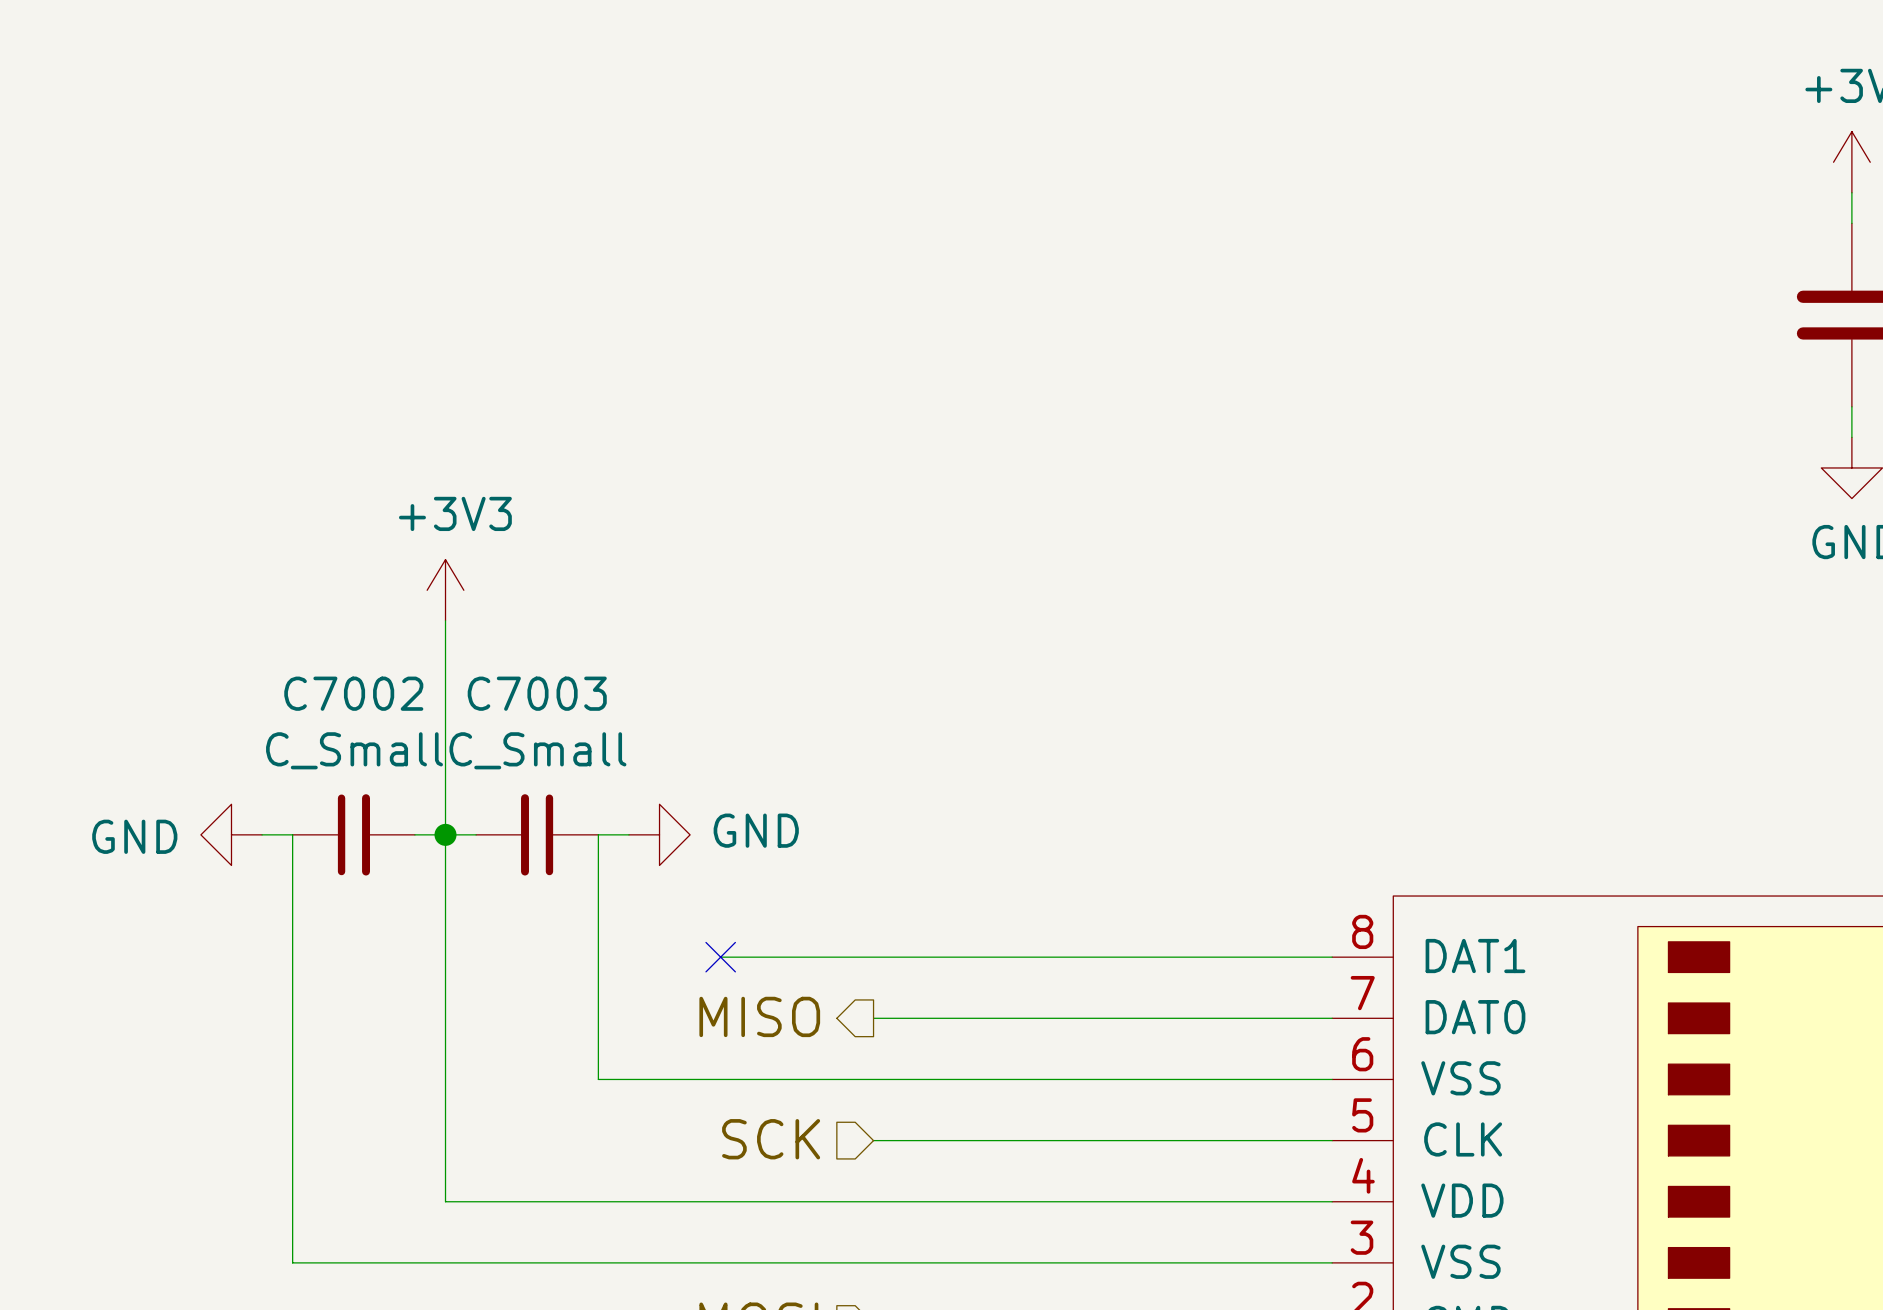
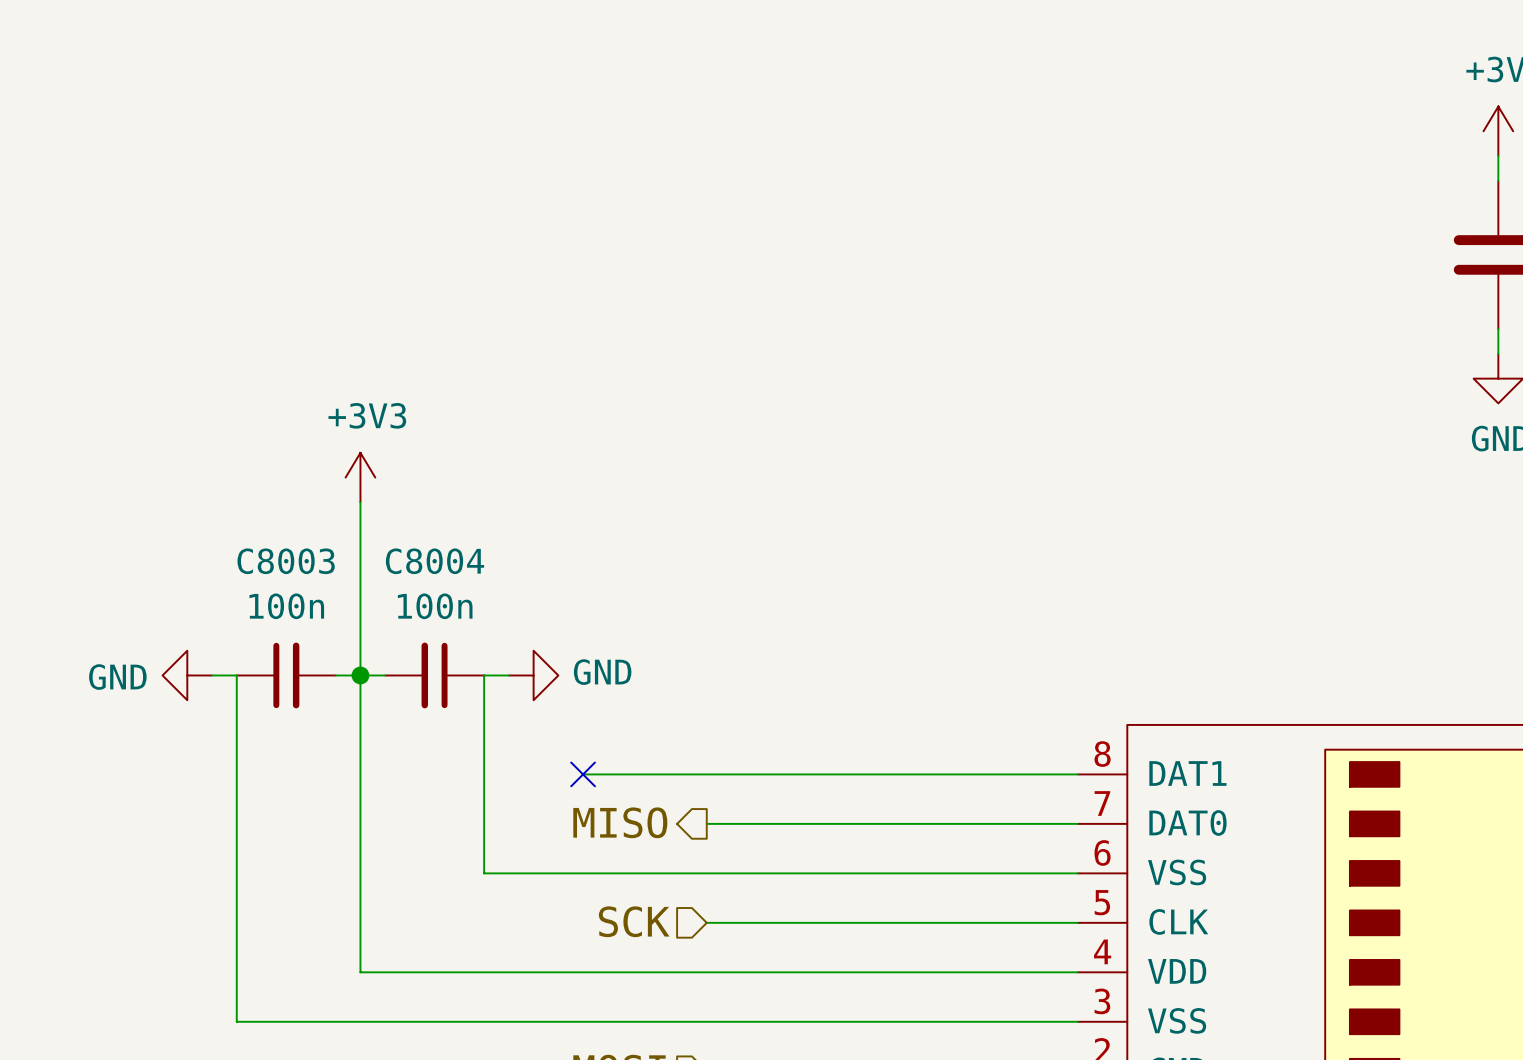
C7002 name: C7002 (353, 693) -> C8003 (286, 561)
C7003 name: C7003 (537, 693) -> C8004 (435, 561)
C7002 value: C_Small (354, 750) -> 100n (286, 606)
C7003 value: C_Small (537, 750) -> 100n (435, 606)

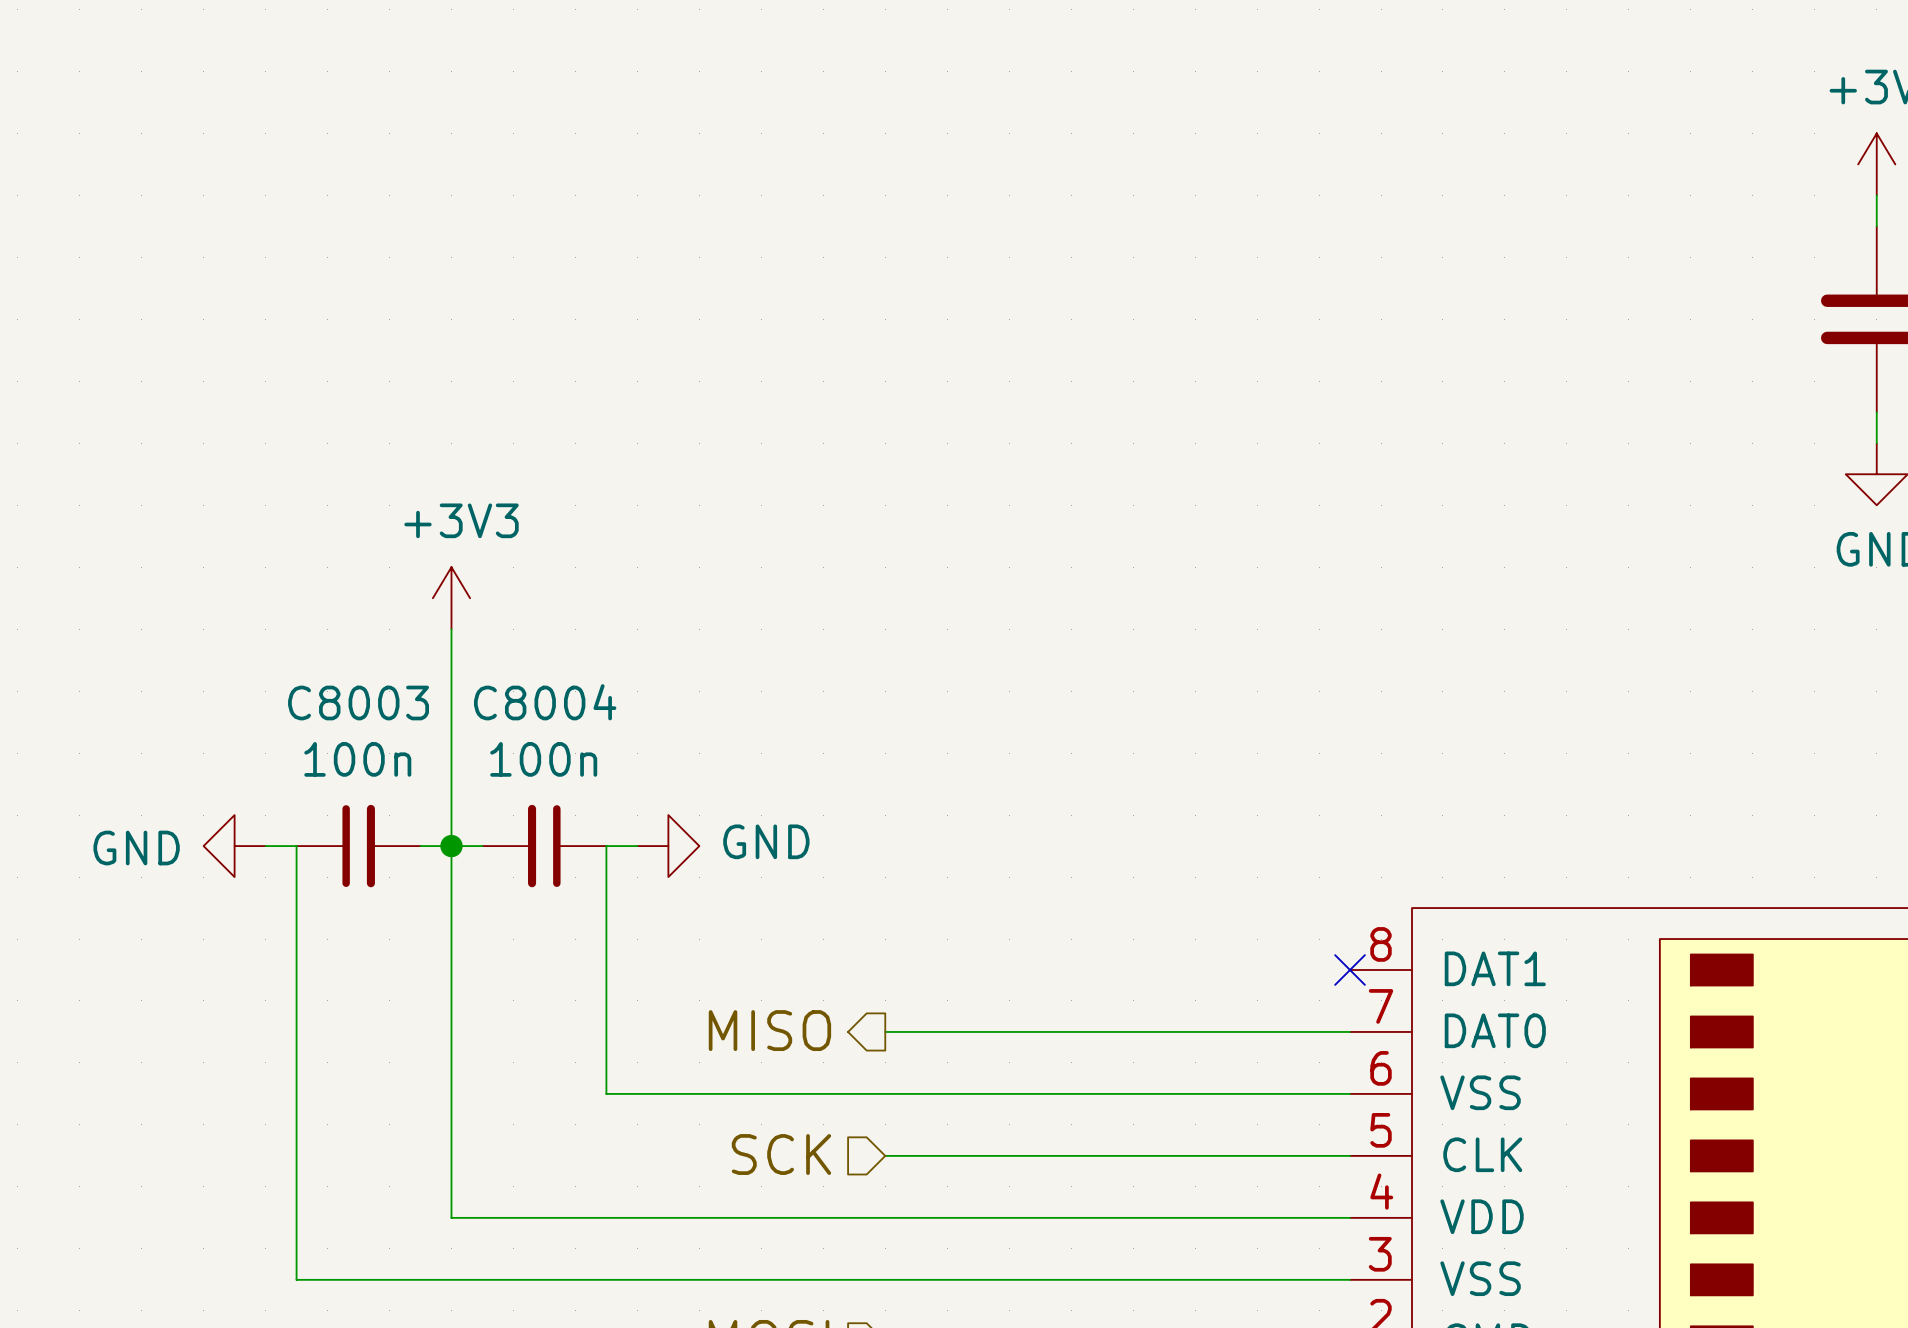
wire: (583, 774) (1077, 774) -> none
no-connect mark: (583, 774) -> none
no-connect mark: none -> (1350, 970)

